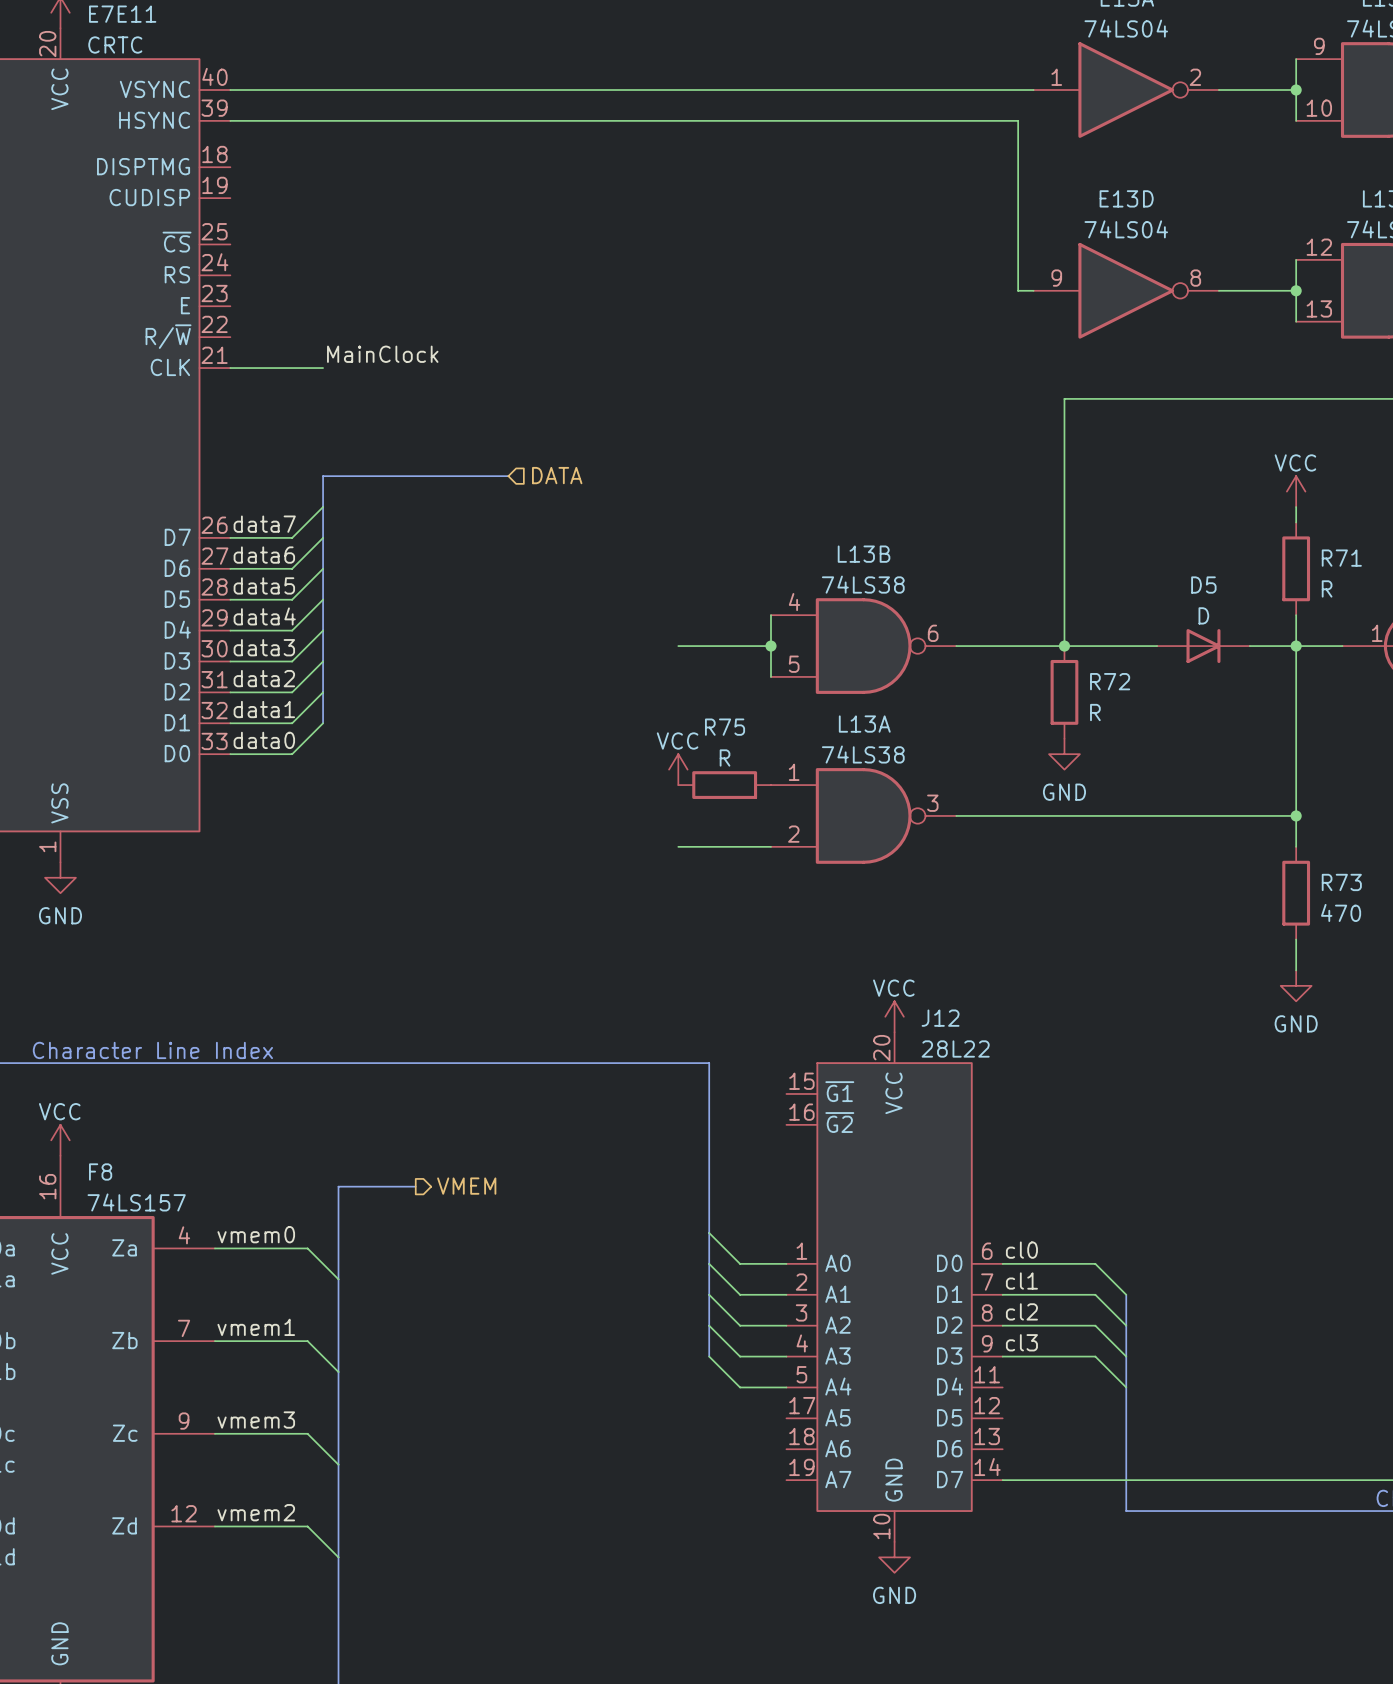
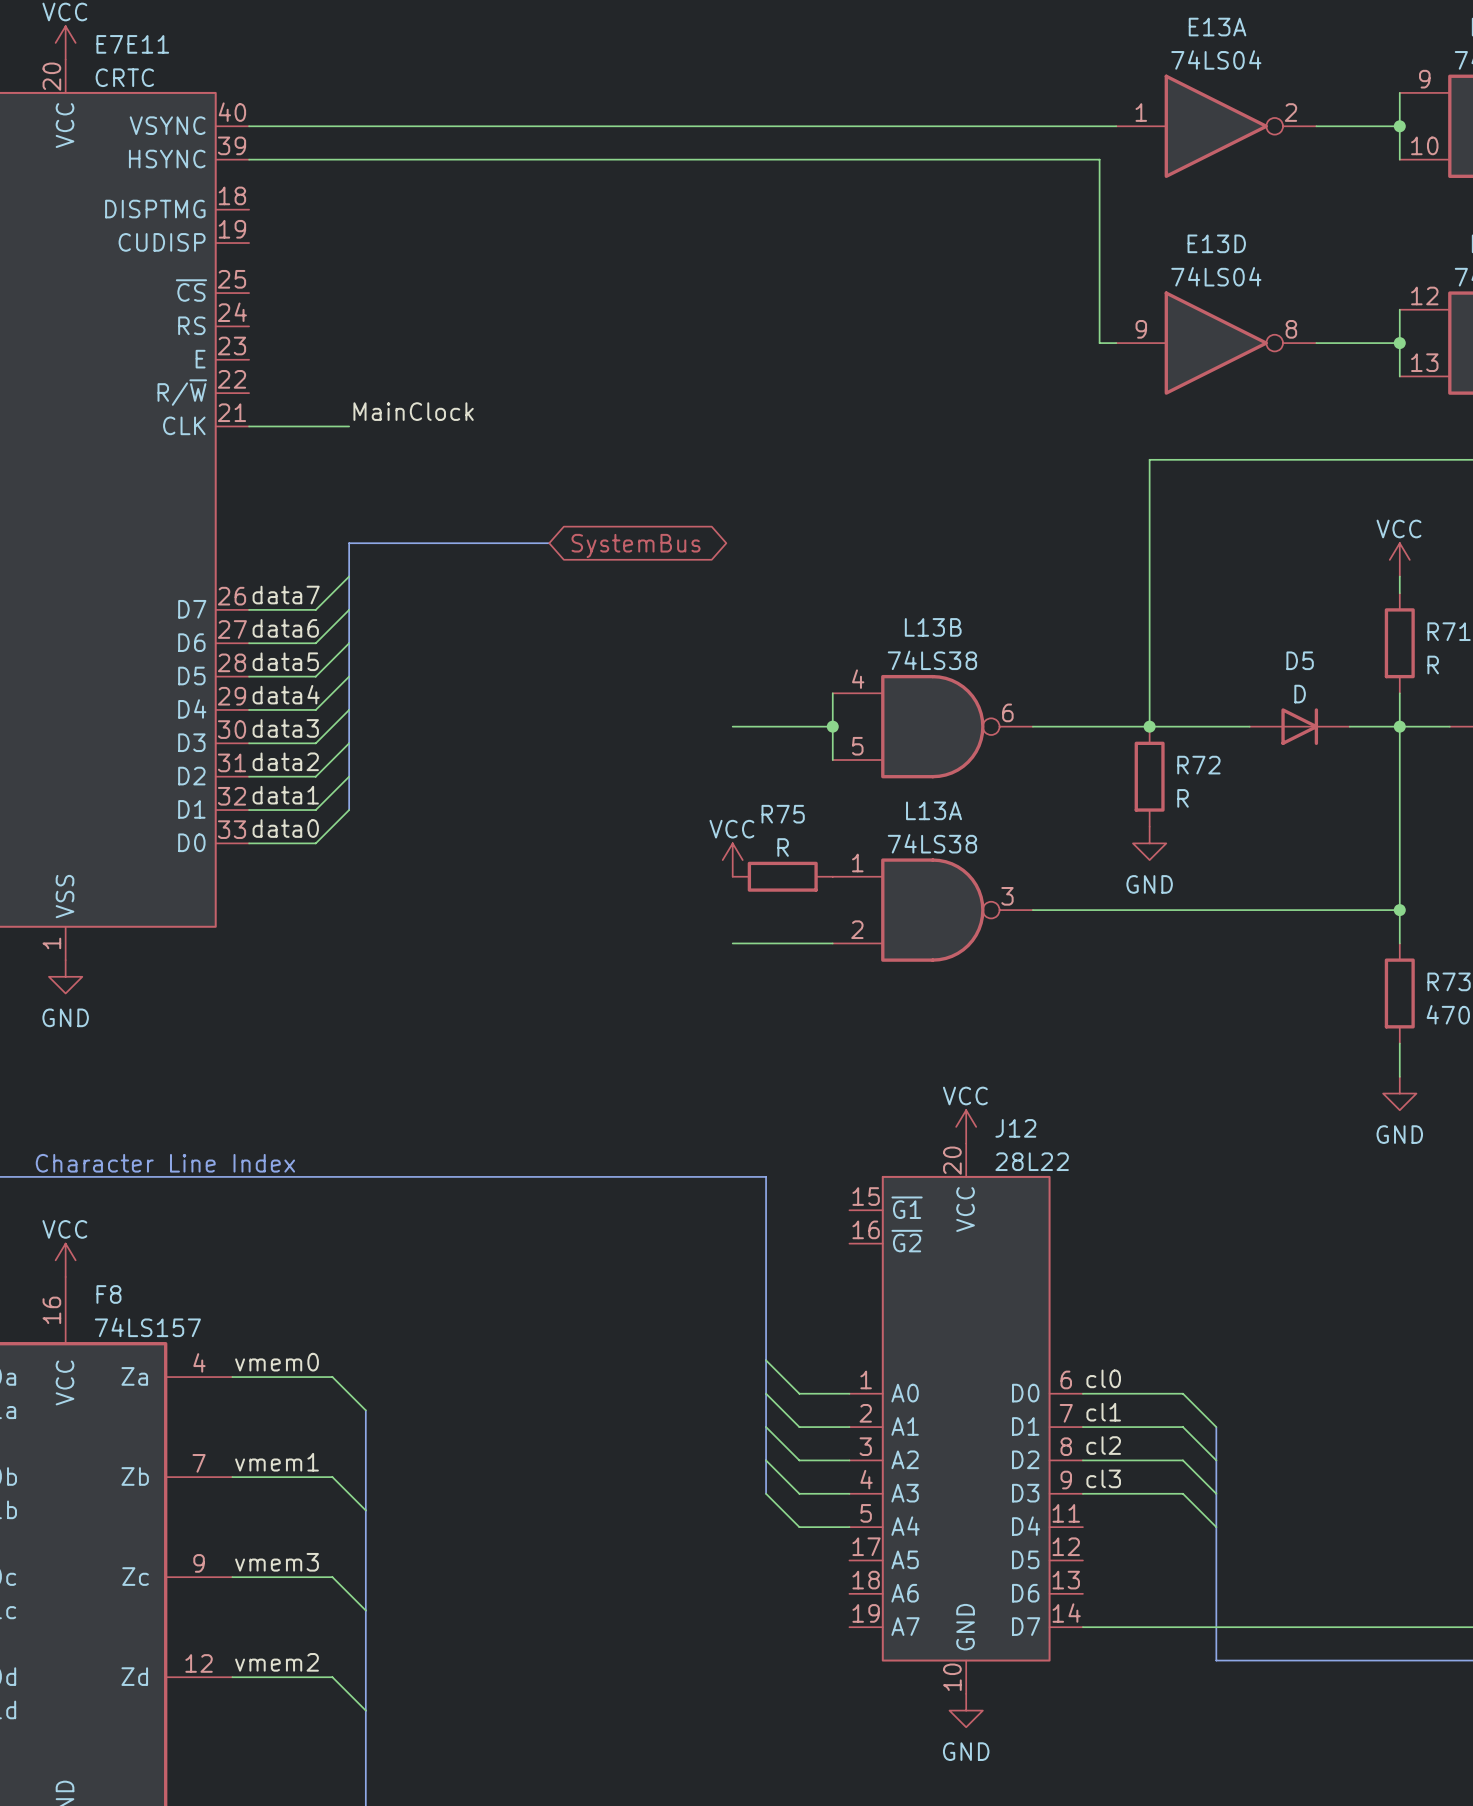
hierarchical label: DATA (557, 475) -> none
global label: none -> SystemBus (636, 545)
bus: (415, 1186) (338, 1186) (338, 1279) -> none
hierarchical label: VMEM (466, 1186) -> none

